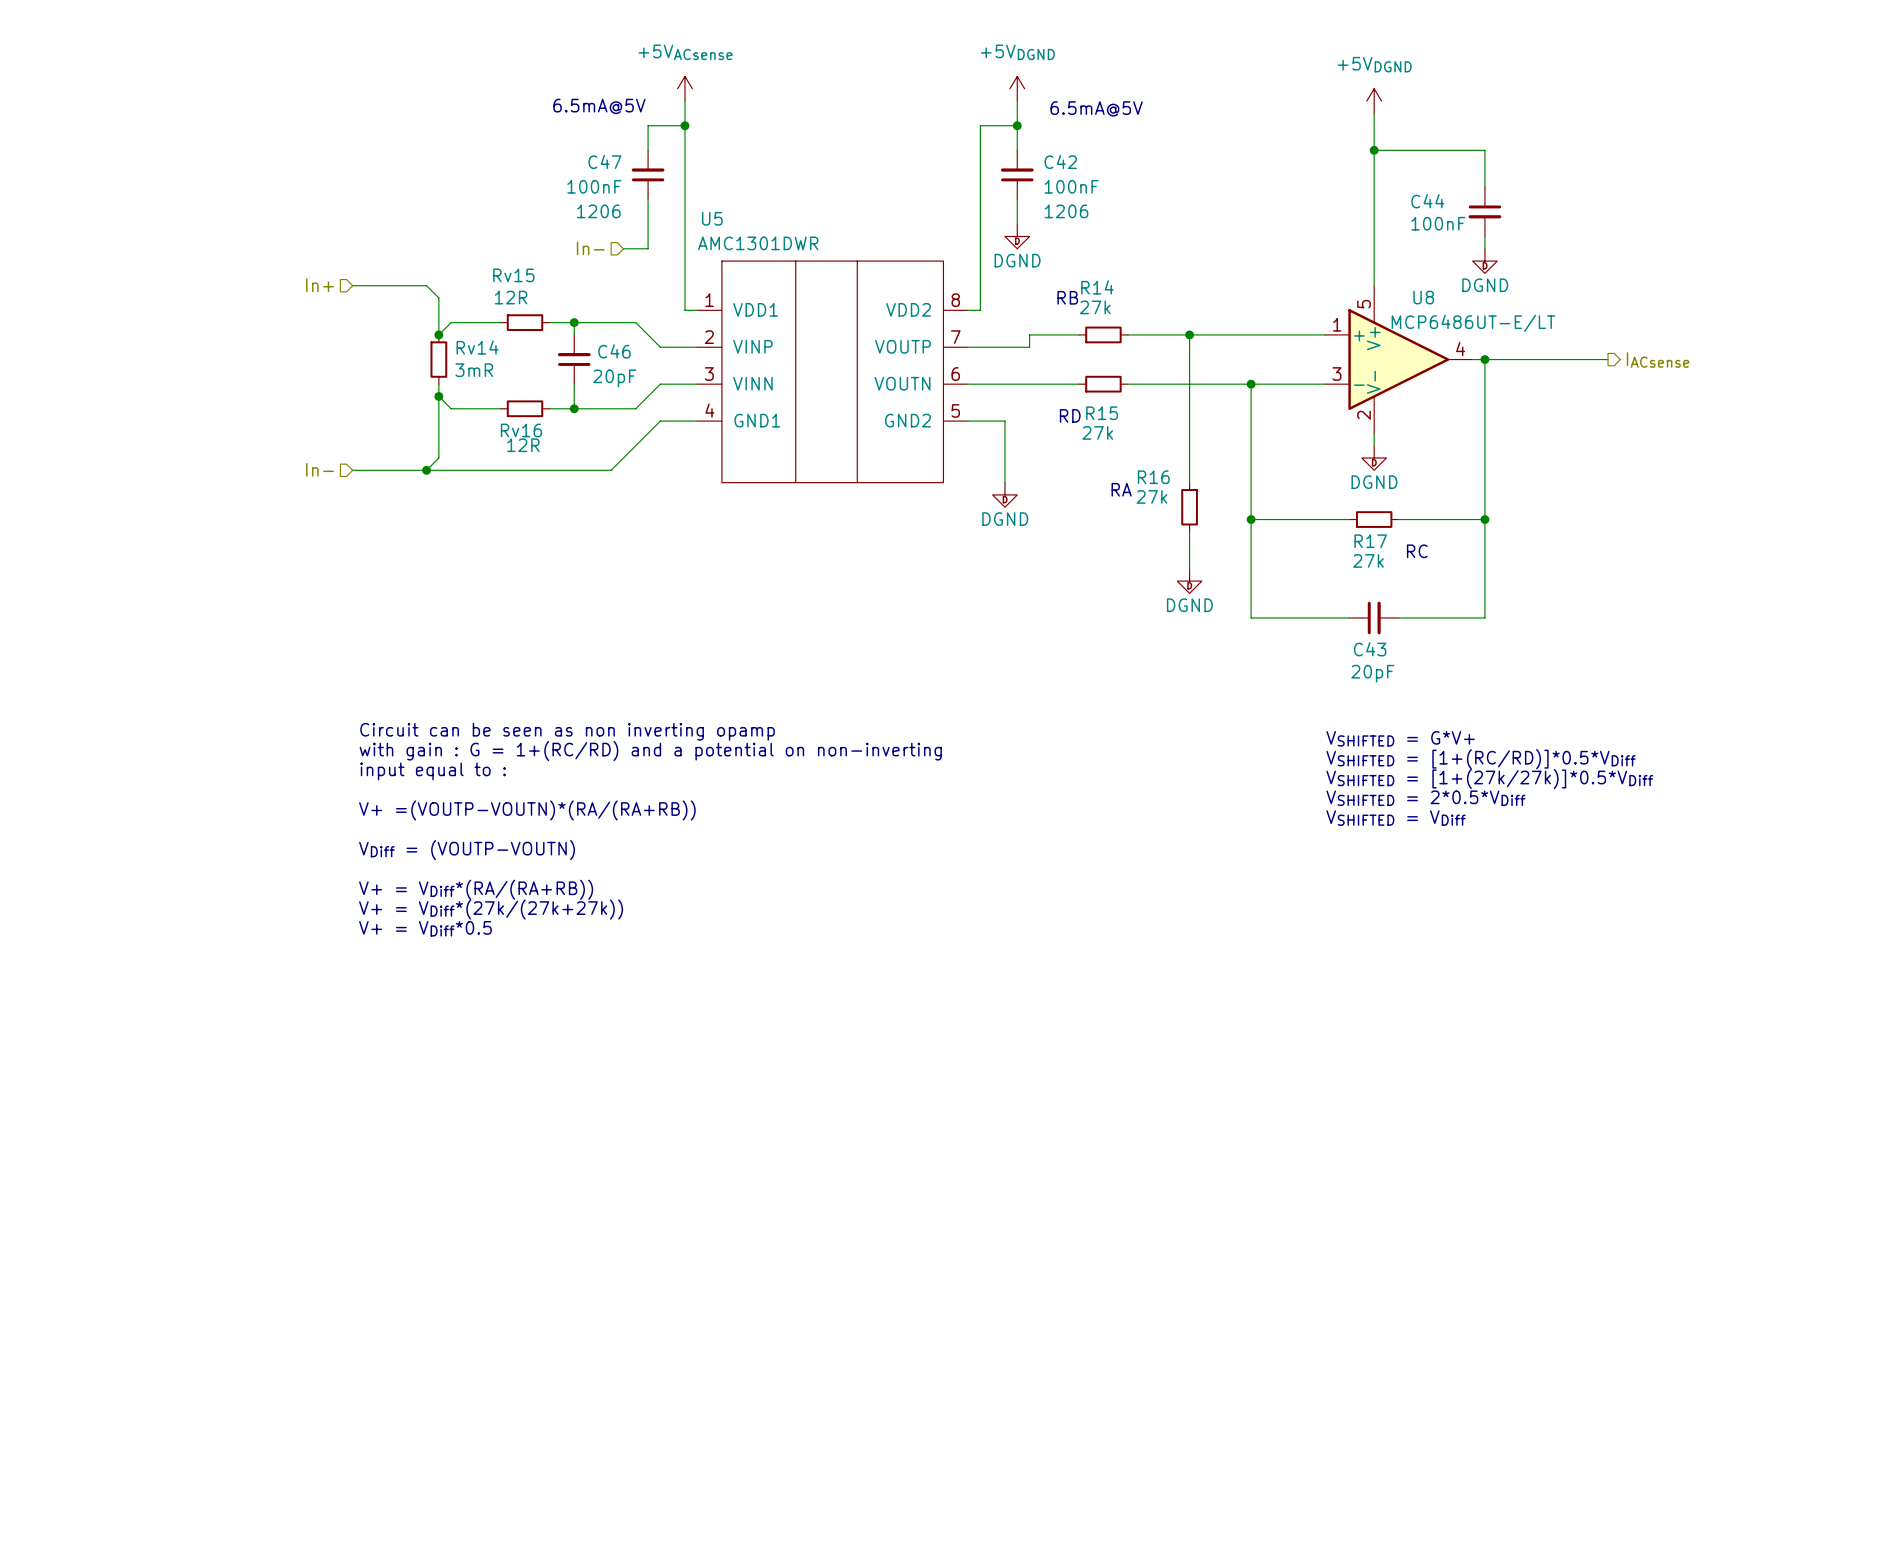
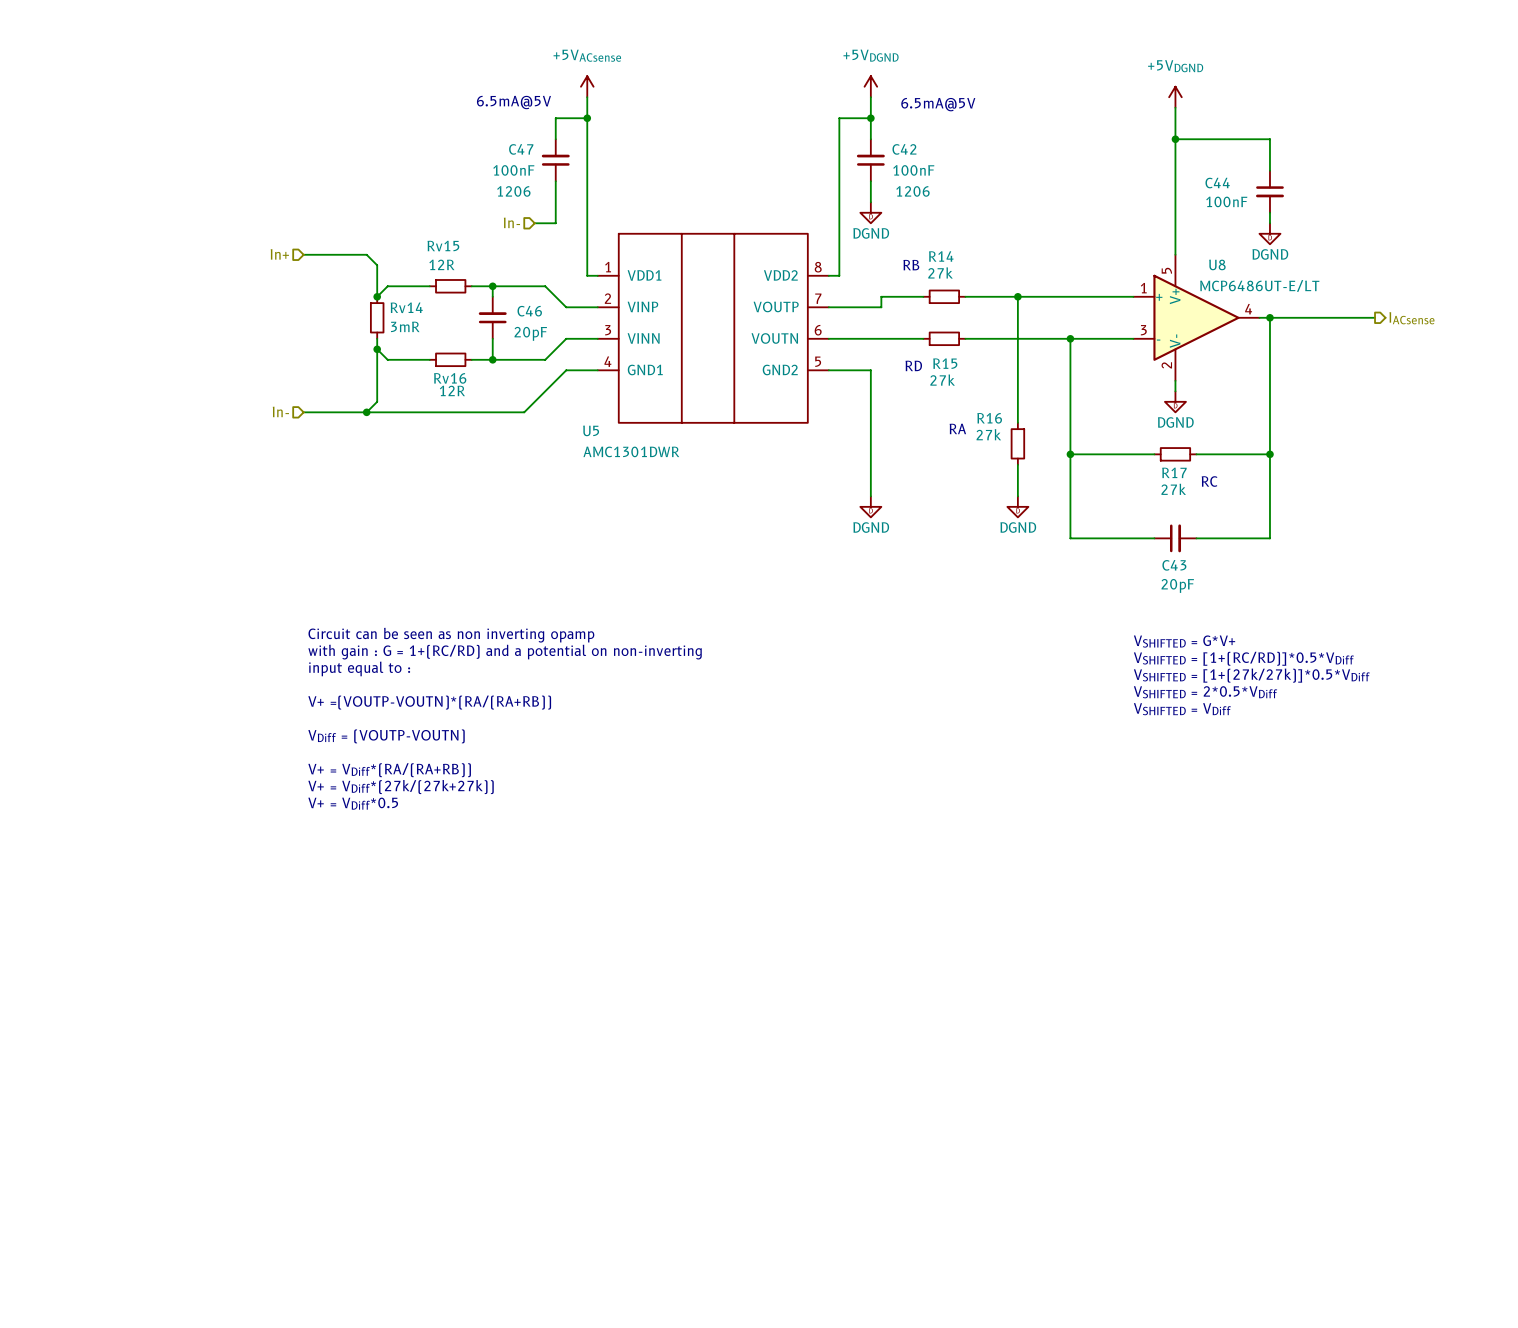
U5 name position: U5 (712, 218) -> U5 (591, 430)
U5 value position: AMC1301DWR (758, 243) -> AMC1301DWR (631, 451)
wire: (1004, 421) (1004, 482) -> (860, 370) (870, 370) (870, 496)
power symbol position: DGND (1004, 494) -> DGND (870, 506)

